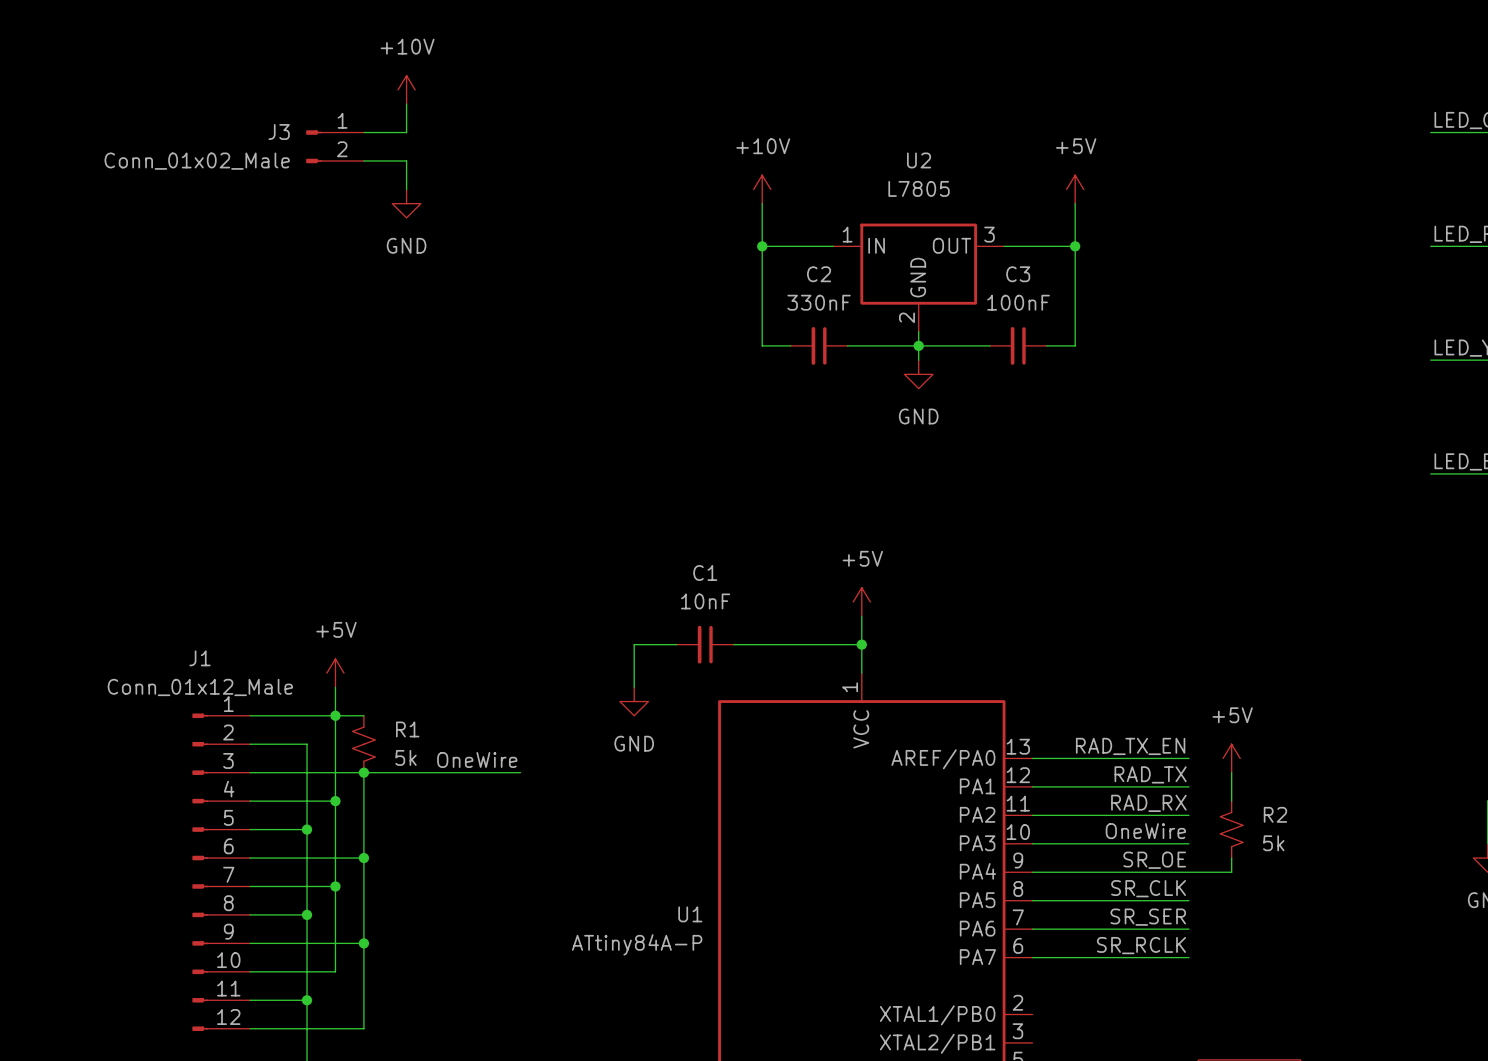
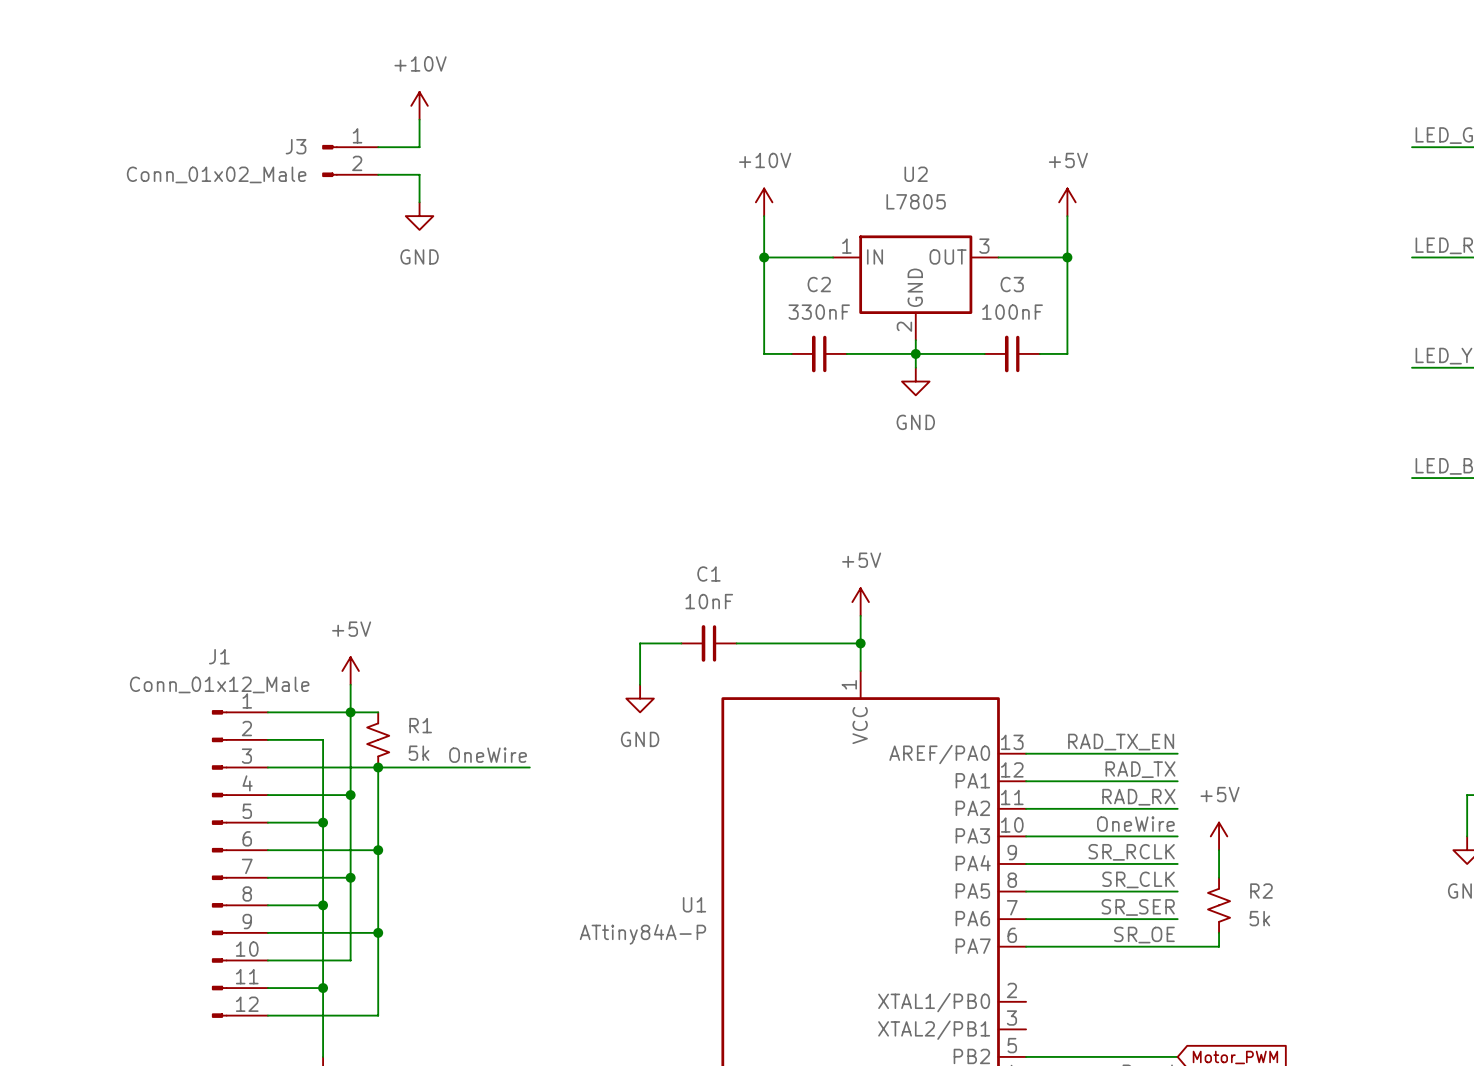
power symbol position: +5V (1231, 758) -> +5V (1219, 836)
wire: (1231, 772) (1231, 801) -> none
R2 position: (1231, 829) -> (1219, 905)
label: SR_OE (1154, 860) -> SR_RCLK (1131, 852)
wire: (1188, 872) (1231, 872) -> (1219, 877) (1219, 863)
wire: none -> (1219, 932) (1219, 946) (1177, 946)
label: SR_RCLK (1141, 945) -> SR_OE (1144, 935)

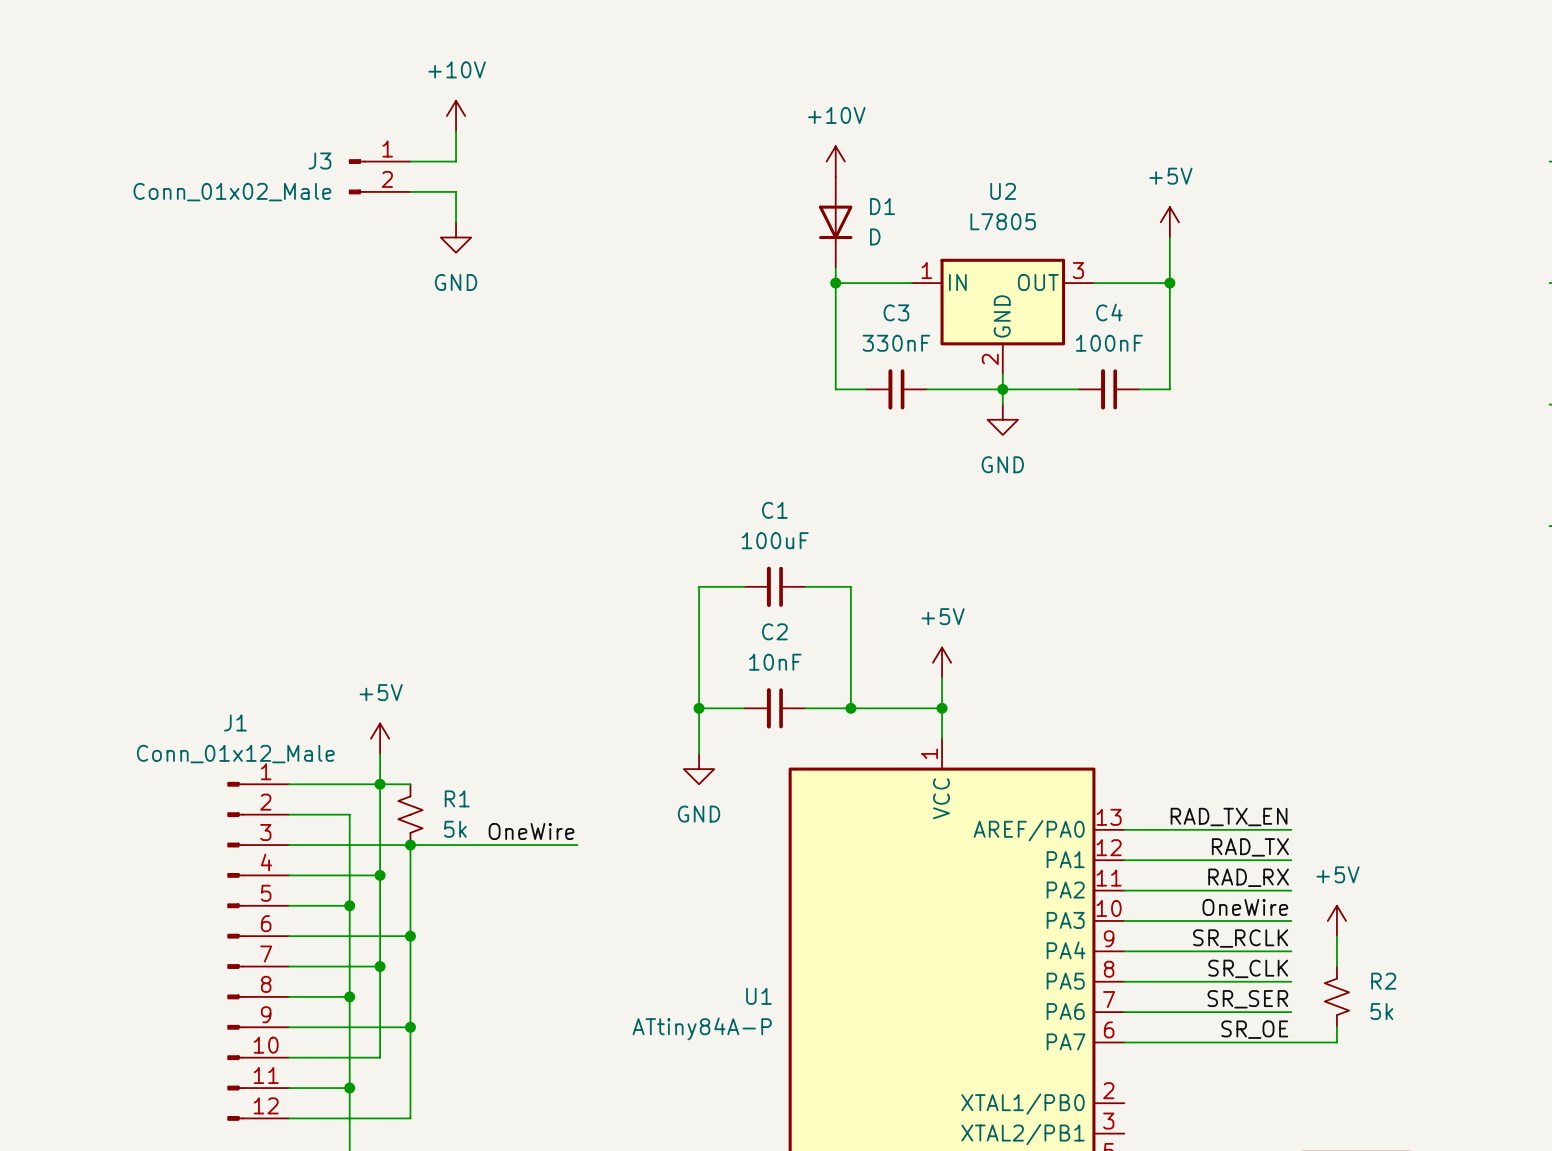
D1: none -> D (835, 222)
power symbol position: +10V (764, 202) -> +10V (835, 161)
C2 name: C2 (819, 284) -> C3 (896, 312)
C3 name: C3 (1012, 284) -> C4 (1109, 312)
wire: none -> (744, 586) (699, 586) (699, 708)
C1: none -> 100uF (774, 586)
wire: none -> (805, 586) (850, 586) (850, 708)
C1 name: C1 (708, 574) -> C2 (774, 631)
junction: none -> (699, 708)
junction: none -> (850, 708)

